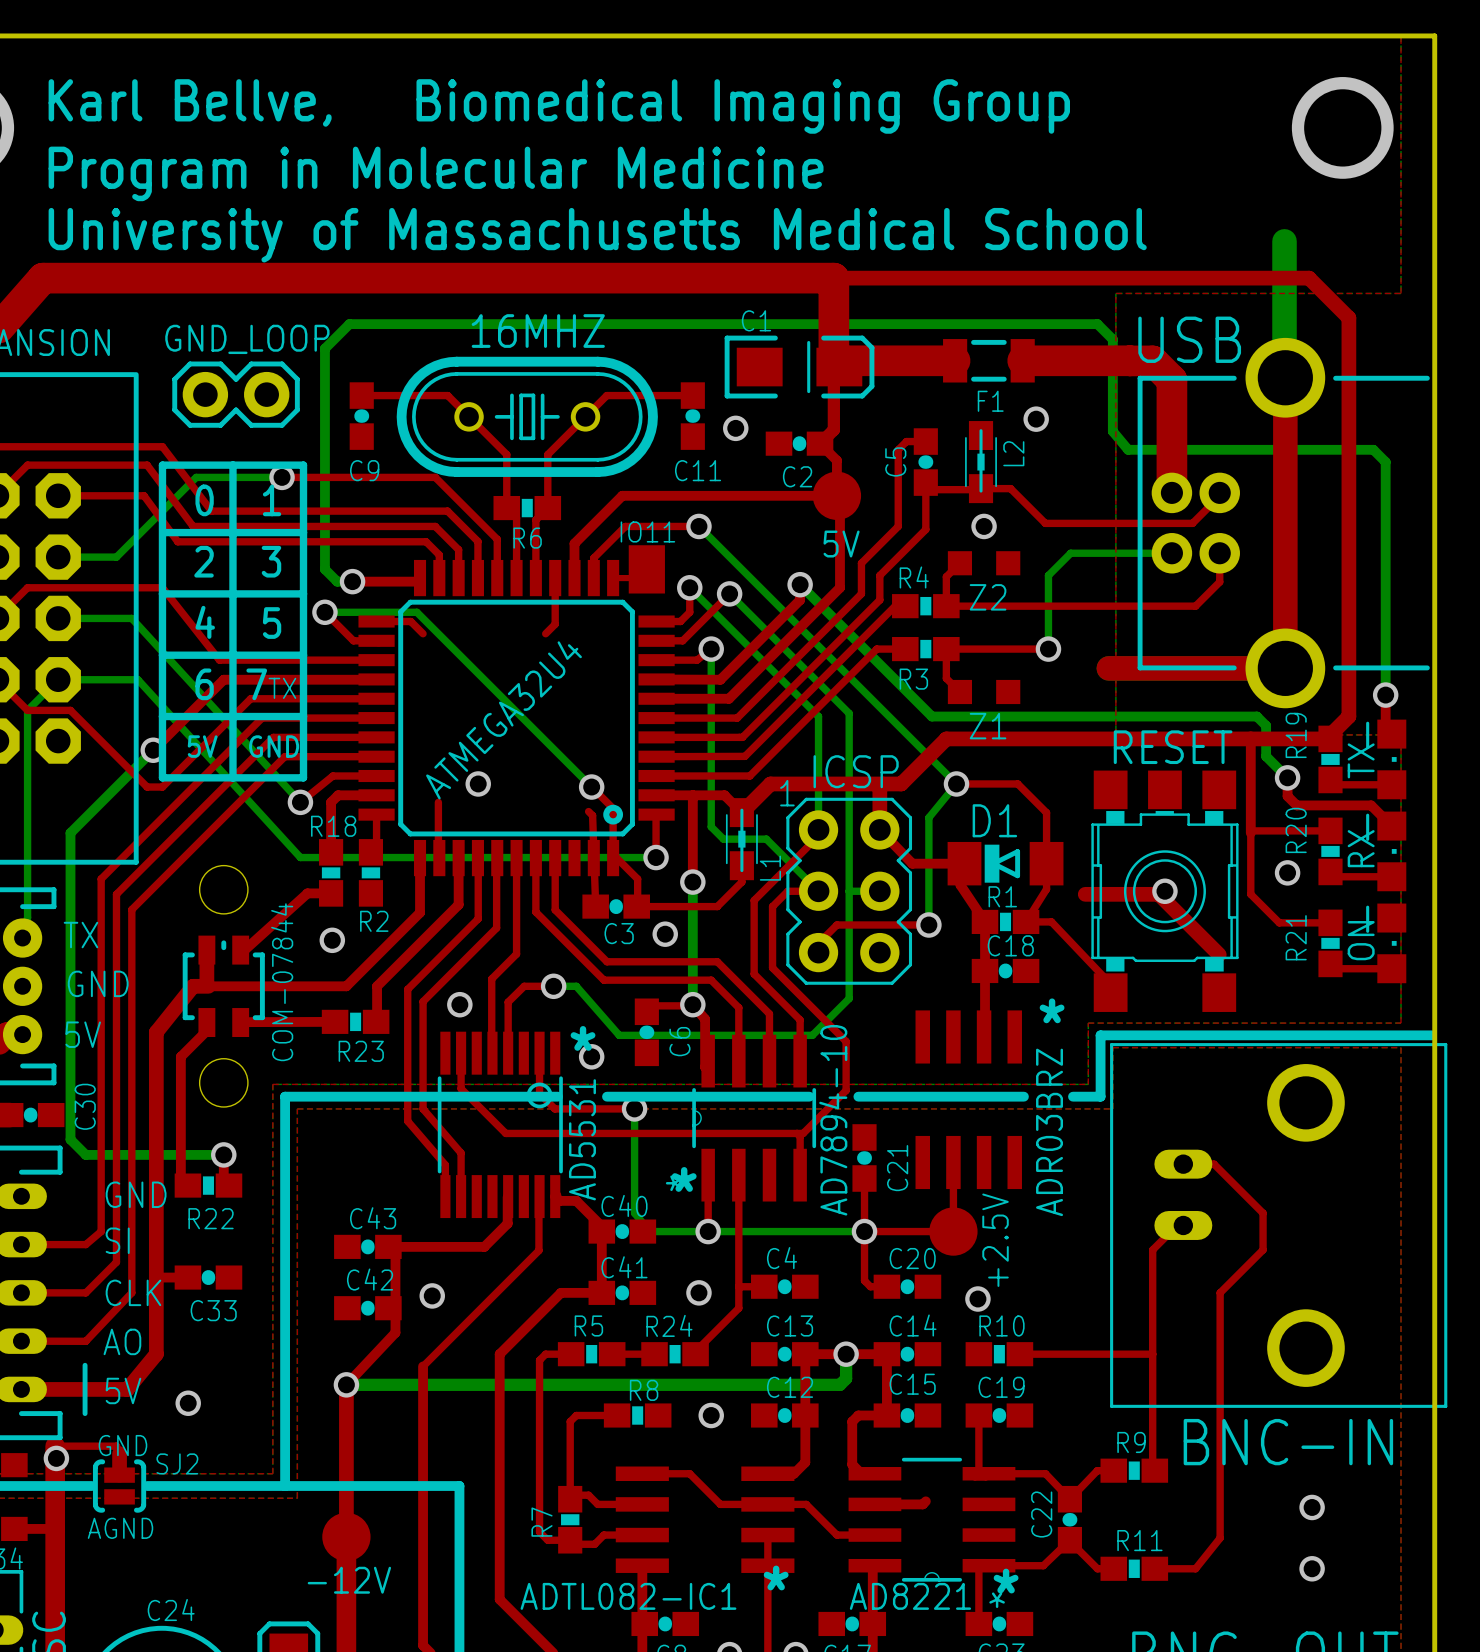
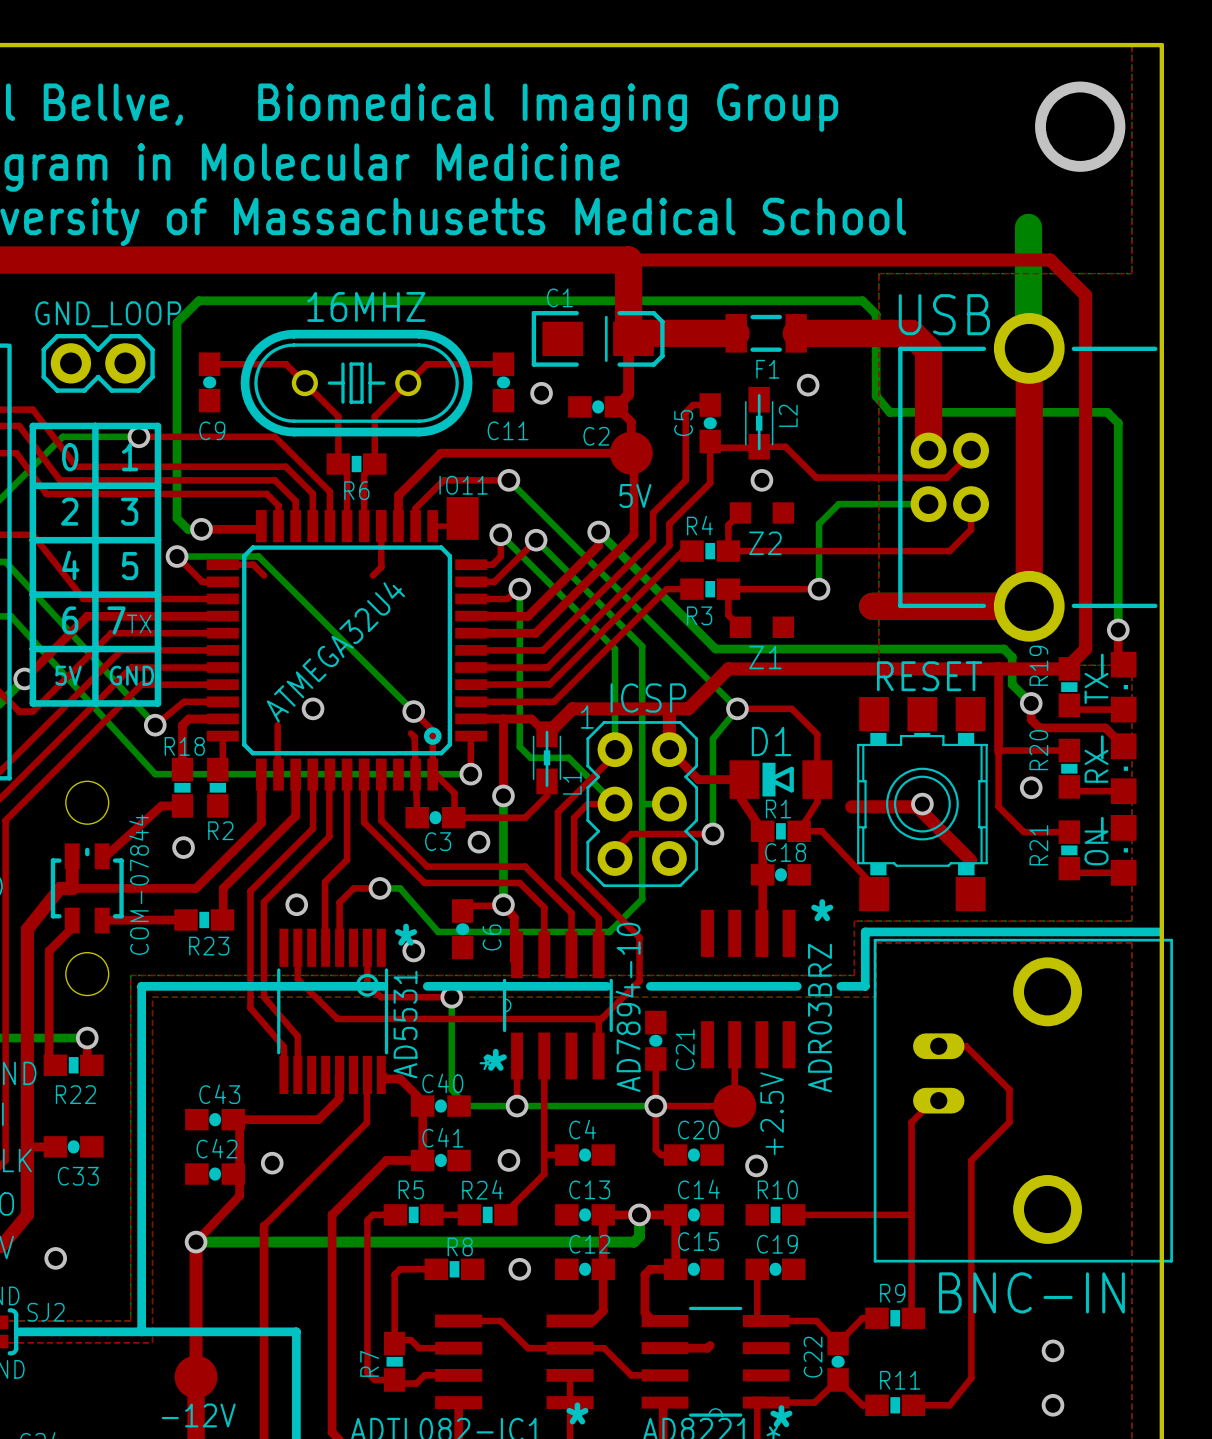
bottom track width: thin (1284, 241) (1284, 379) -> thick (1028, 227) (1028, 349)
top track width: thin (1285, 377) (1285, 668) (1108, 668) -> thick (1029, 348) (1029, 606) (872, 606)

